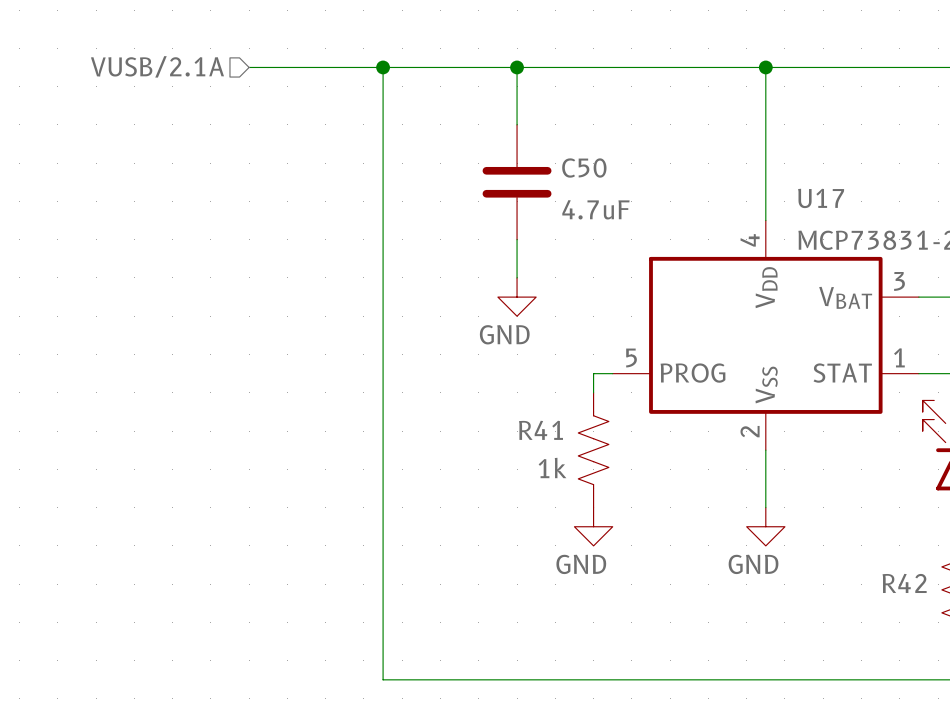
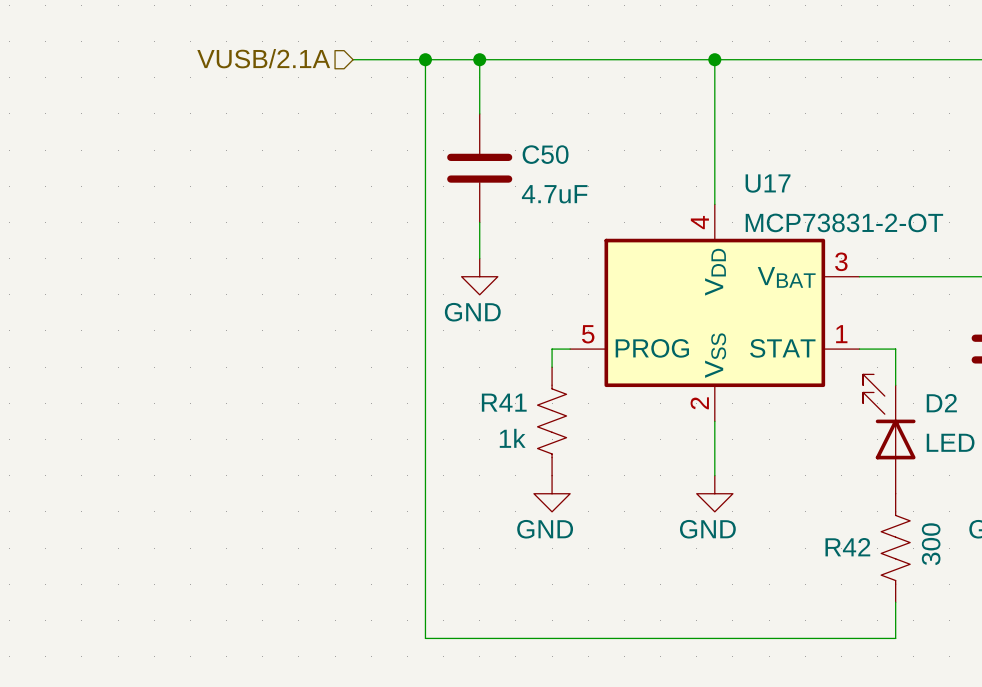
hierarchical label position: VUSB/2.1A (157, 66) -> VUSB/2.1A (263, 58)
wire: (249, 67) (383, 67) (383, 679) (459, 679) -> (425, 59) (425, 638)
junction position: (383, 67) -> (425, 59)

